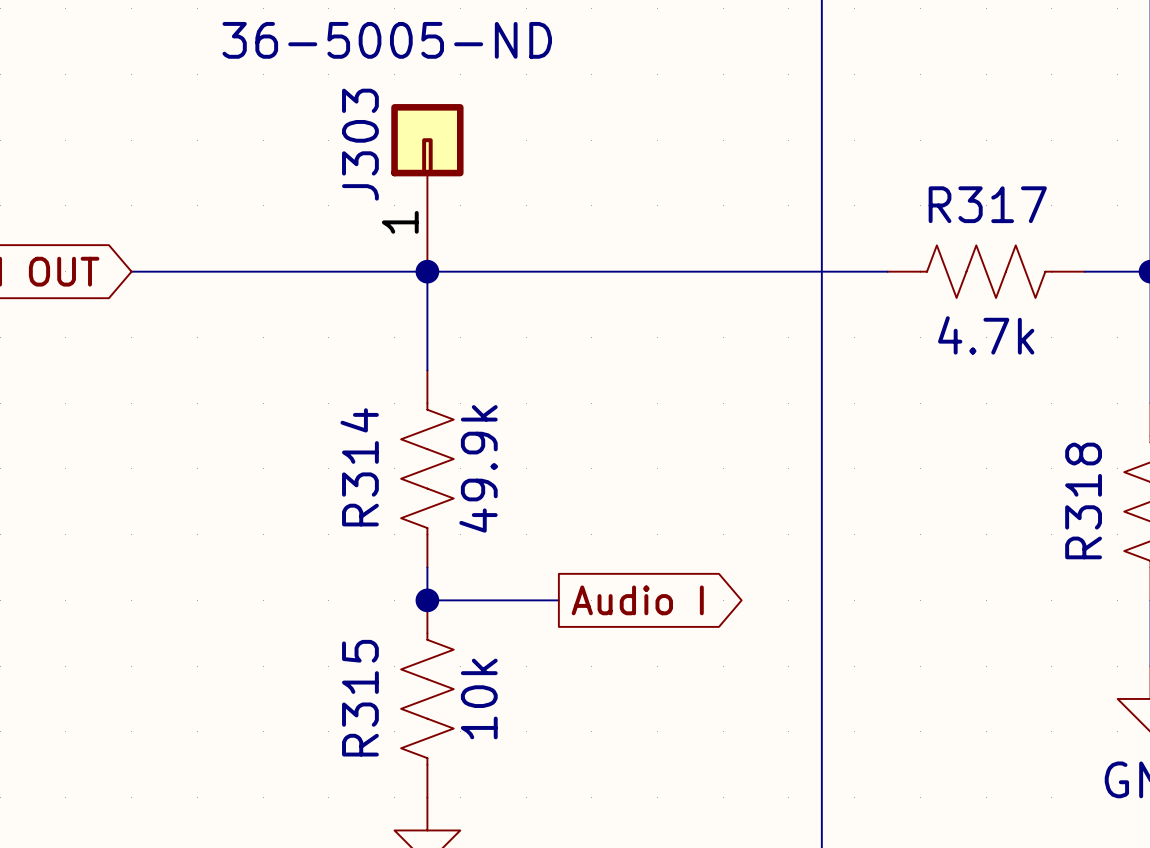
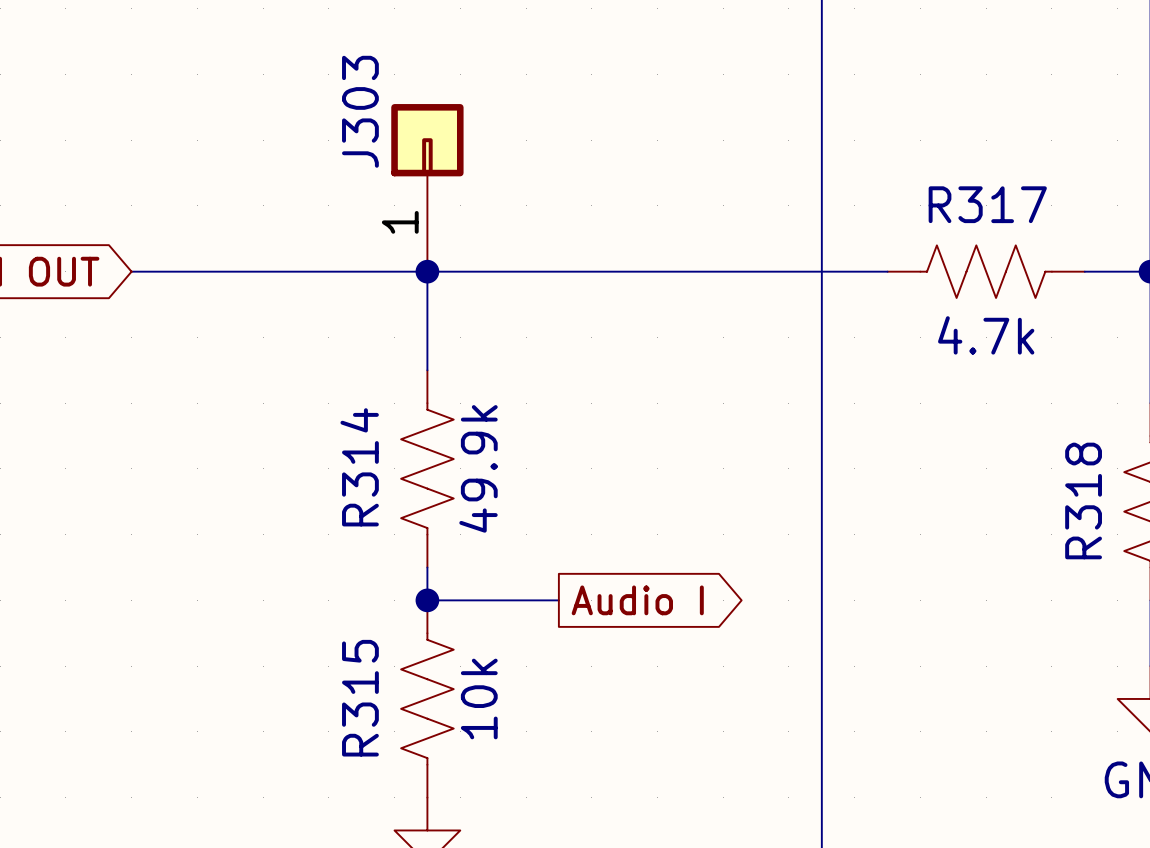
J303 value: 36-5005-ND (387, 40) -> none
J303 name position: J303 (360, 144) -> J303 (360, 111)

